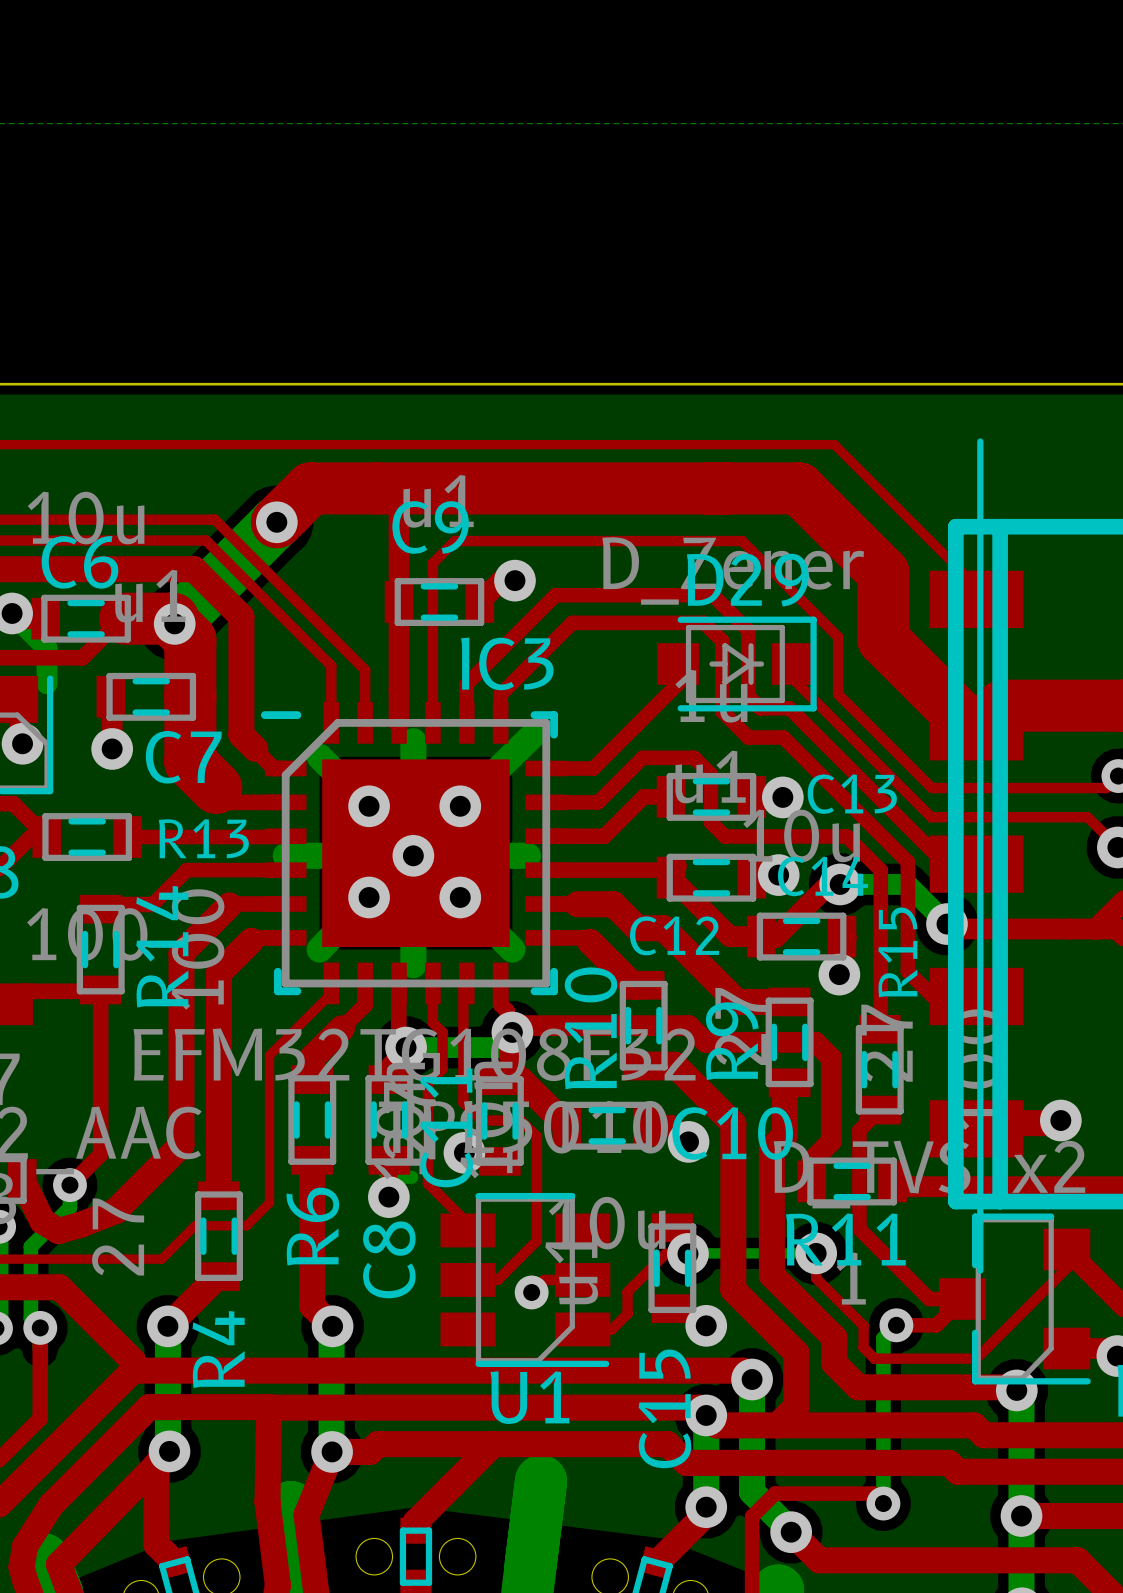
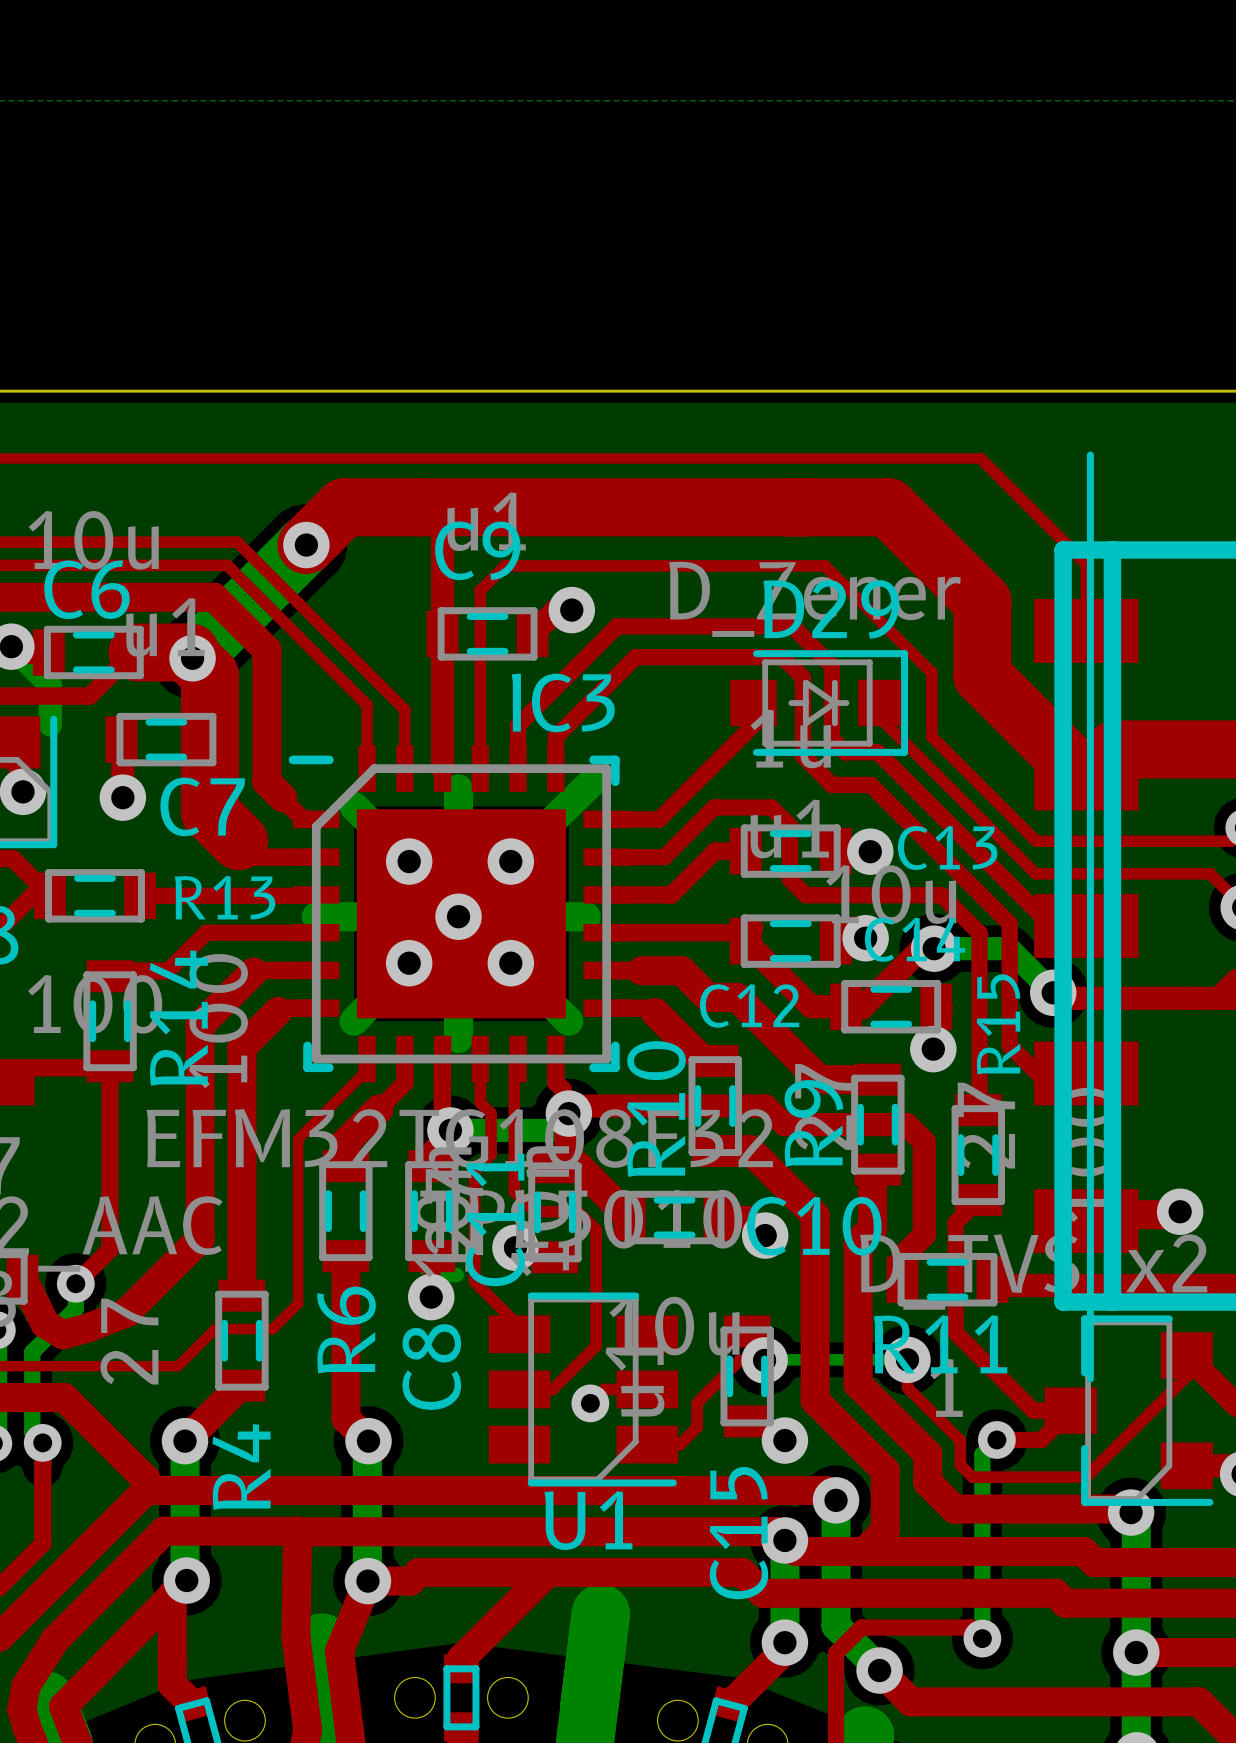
top track: (834, 444) (976, 586) -> (927, 458) (980, 458) (1086, 564) (1086, 617)

